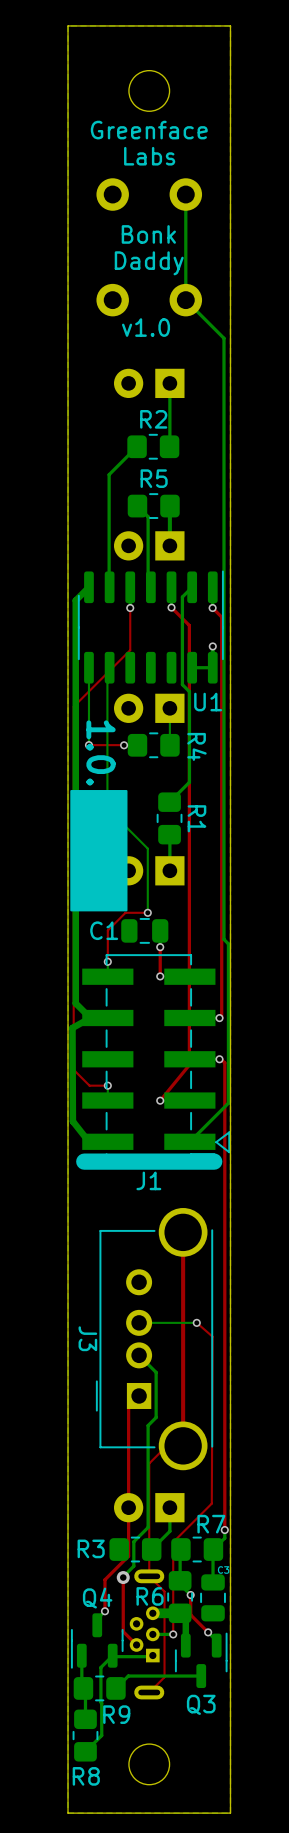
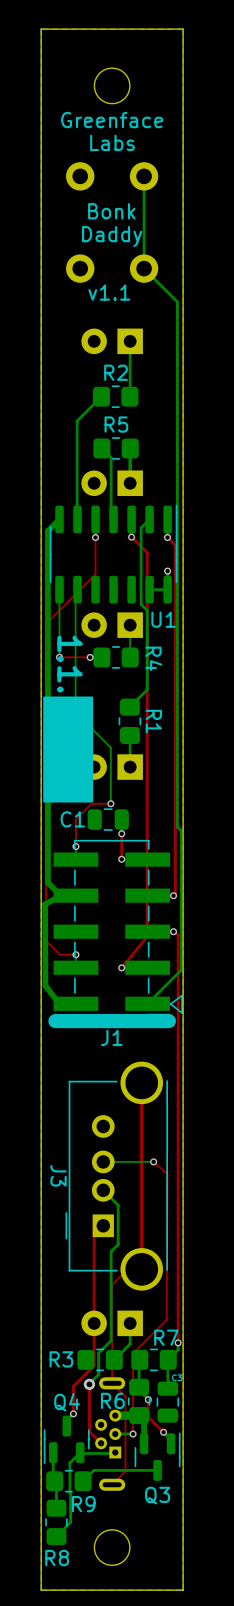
text: v1.0 (146, 327) -> v1.1 (109, 292)
text: 1.0. (101, 753) -> 1.1. (70, 664)

